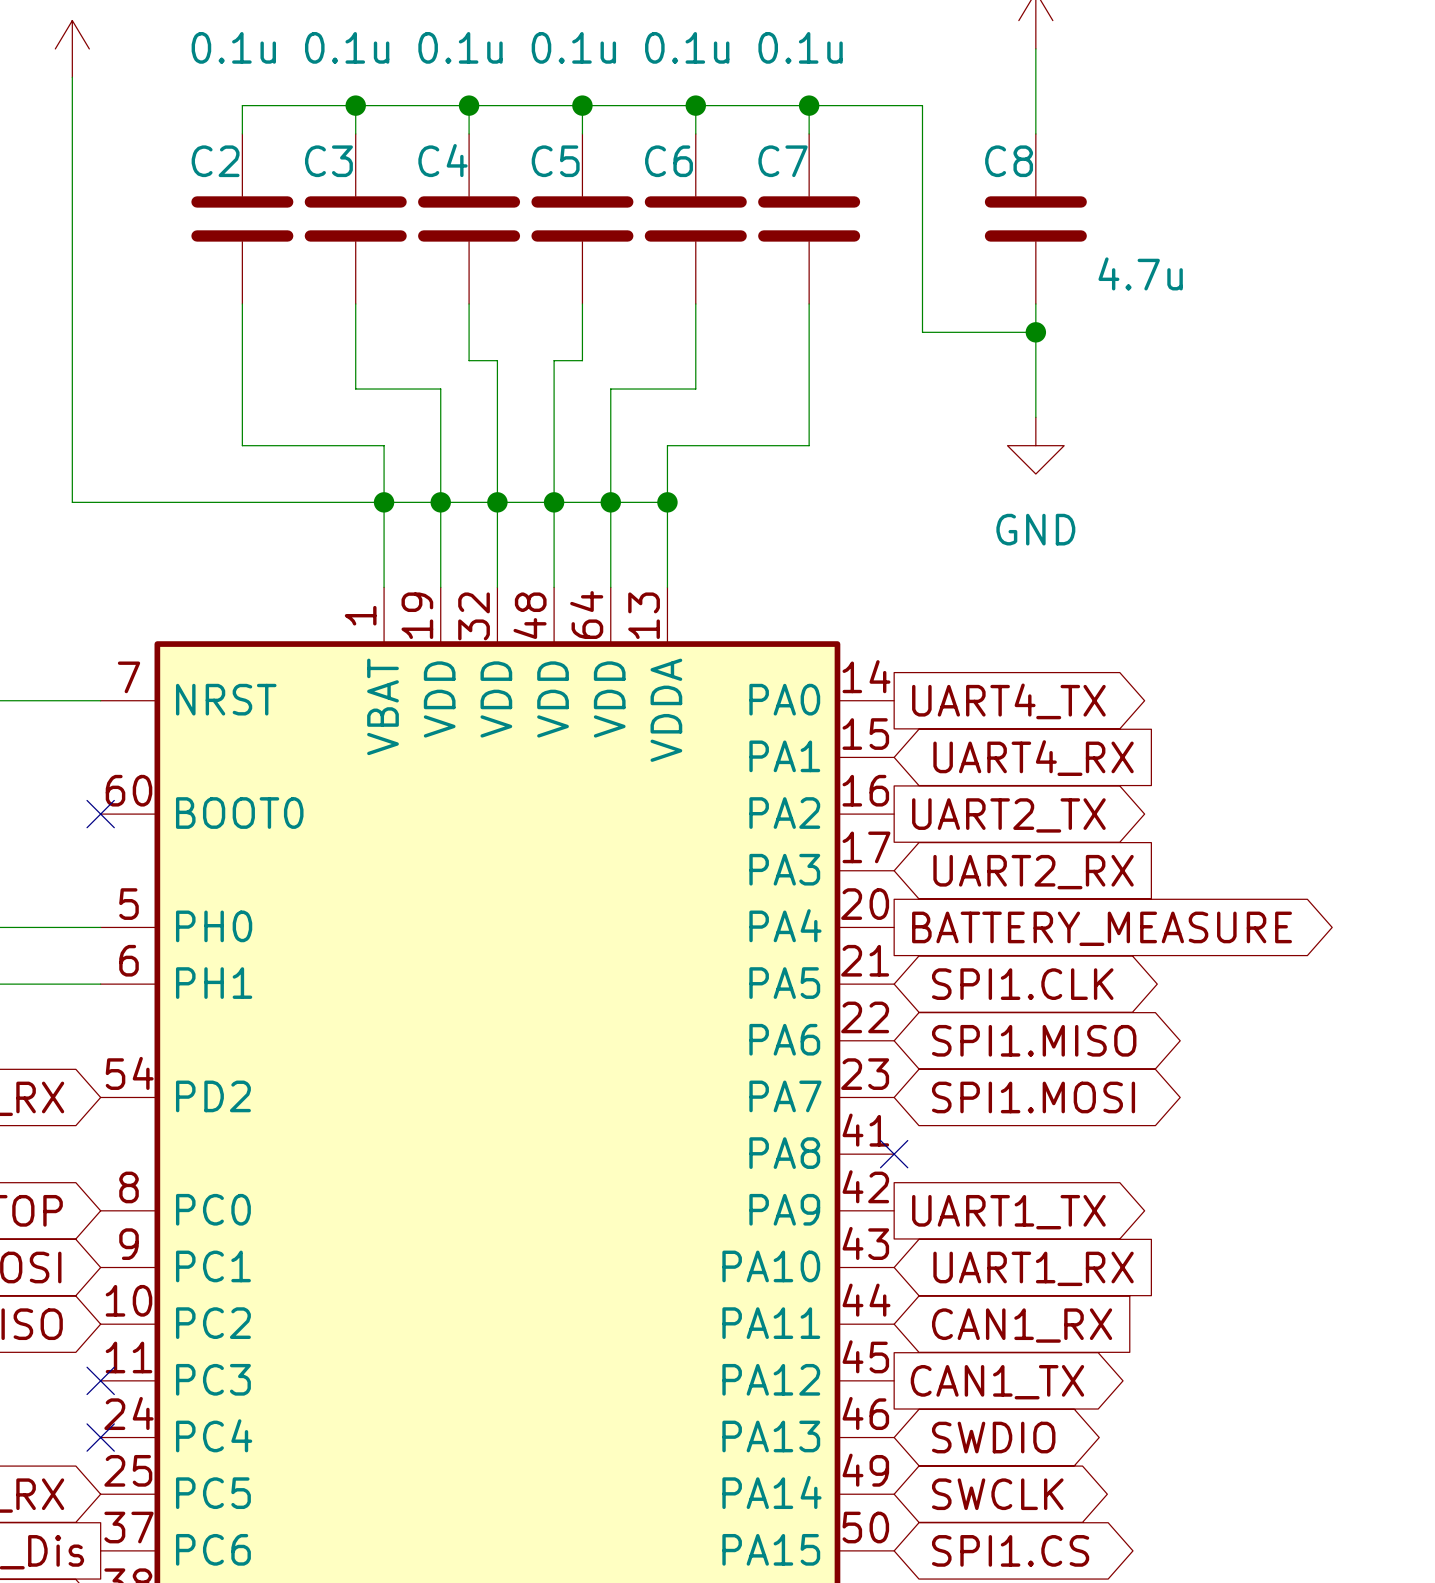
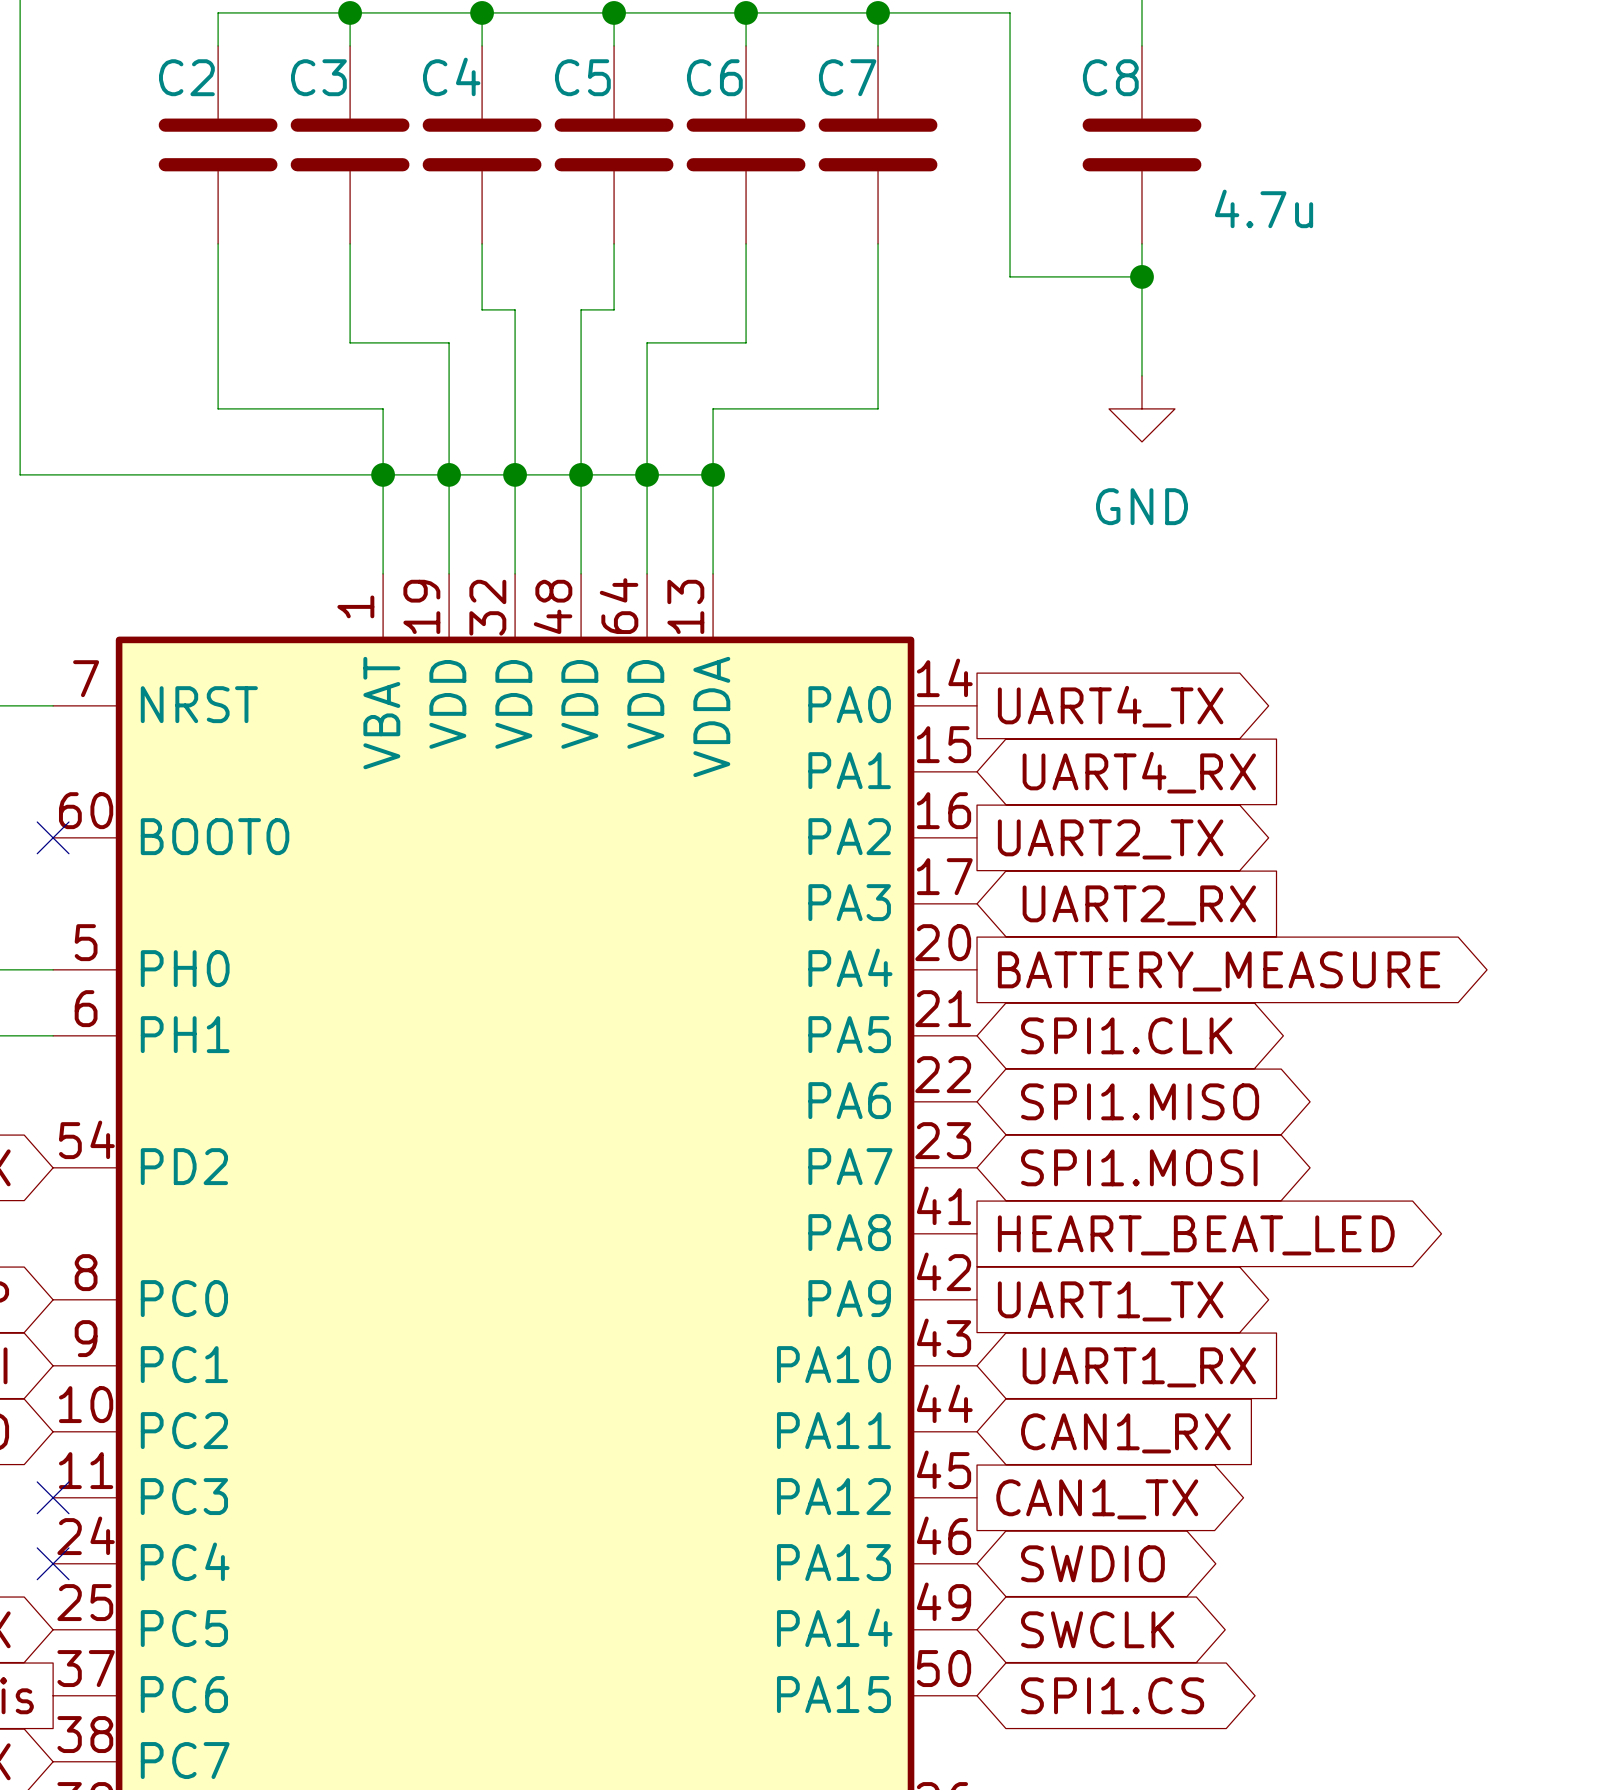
no-connect mark: (894, 1154) -> none
global label: none -> HEART_BEAT_LED (1196, 1235)

